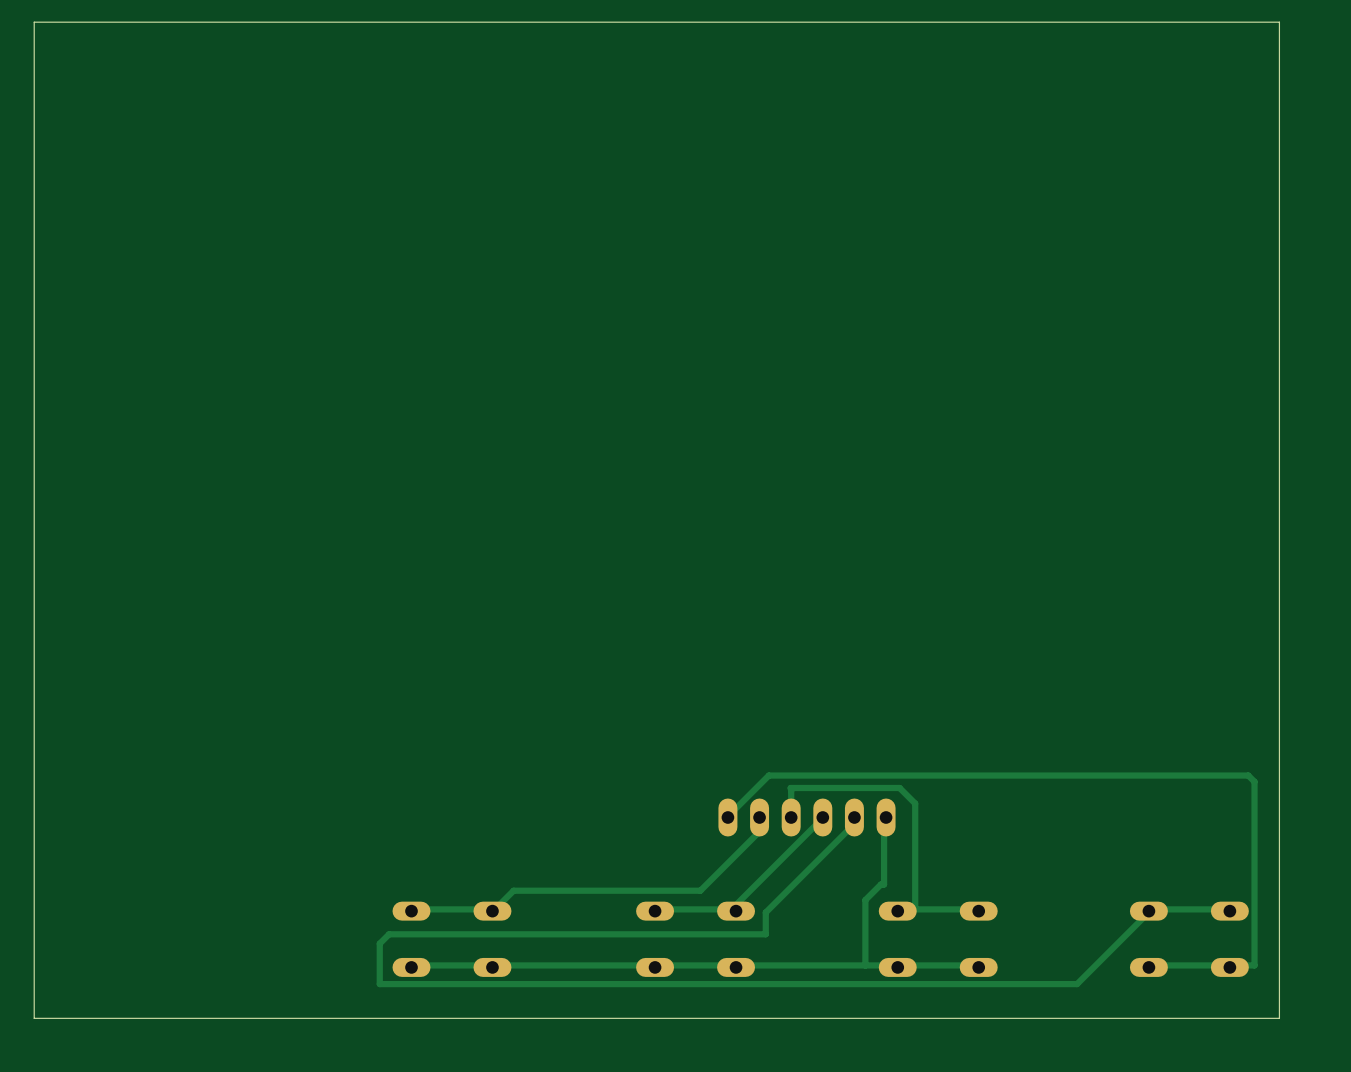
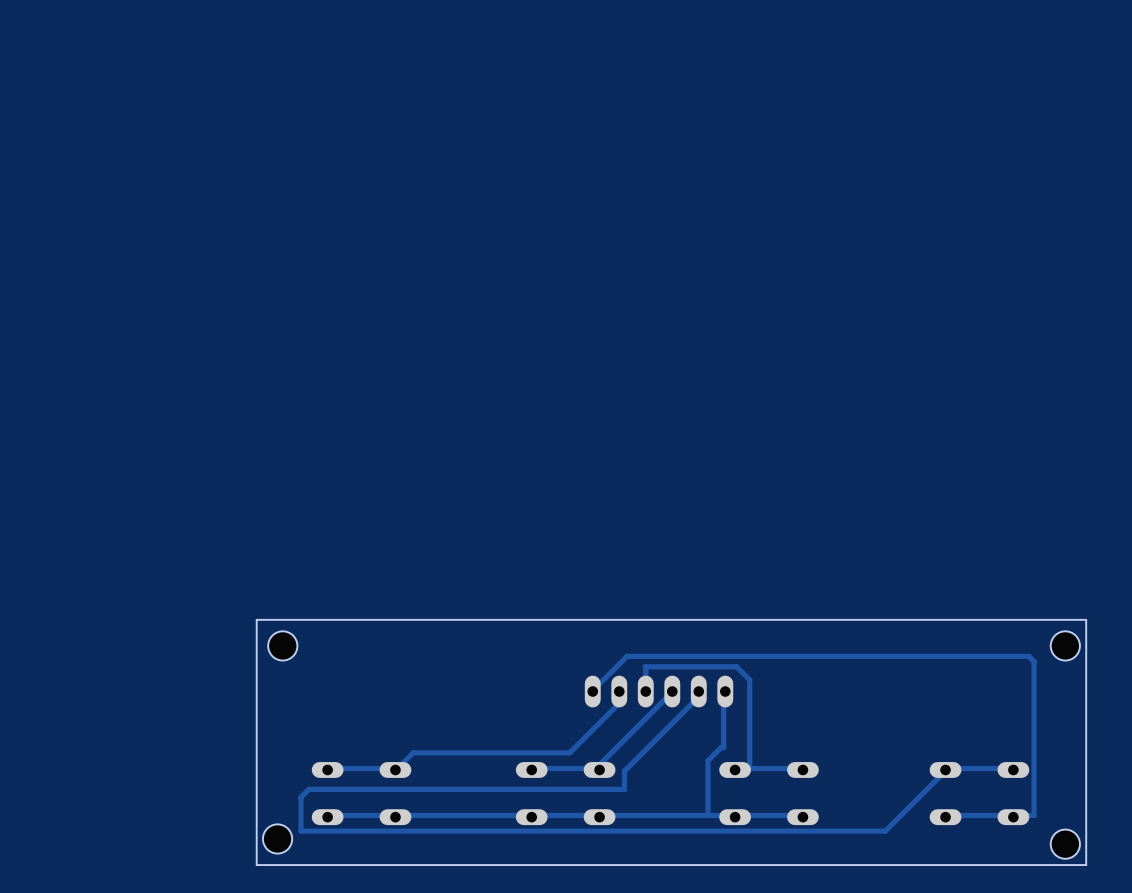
board edge: (1279, 22) (34, 22) (34, 1018) (1279, 1018) (1279, 22) -> none
board edge: none -> (1086, 619) (256, 619) (256, 865) (1086, 865) (1086, 619)
hole: none -> (282, 645)
hole: none -> (1065, 645)
hole: none -> (277, 838)
hole: none -> (1065, 844)

